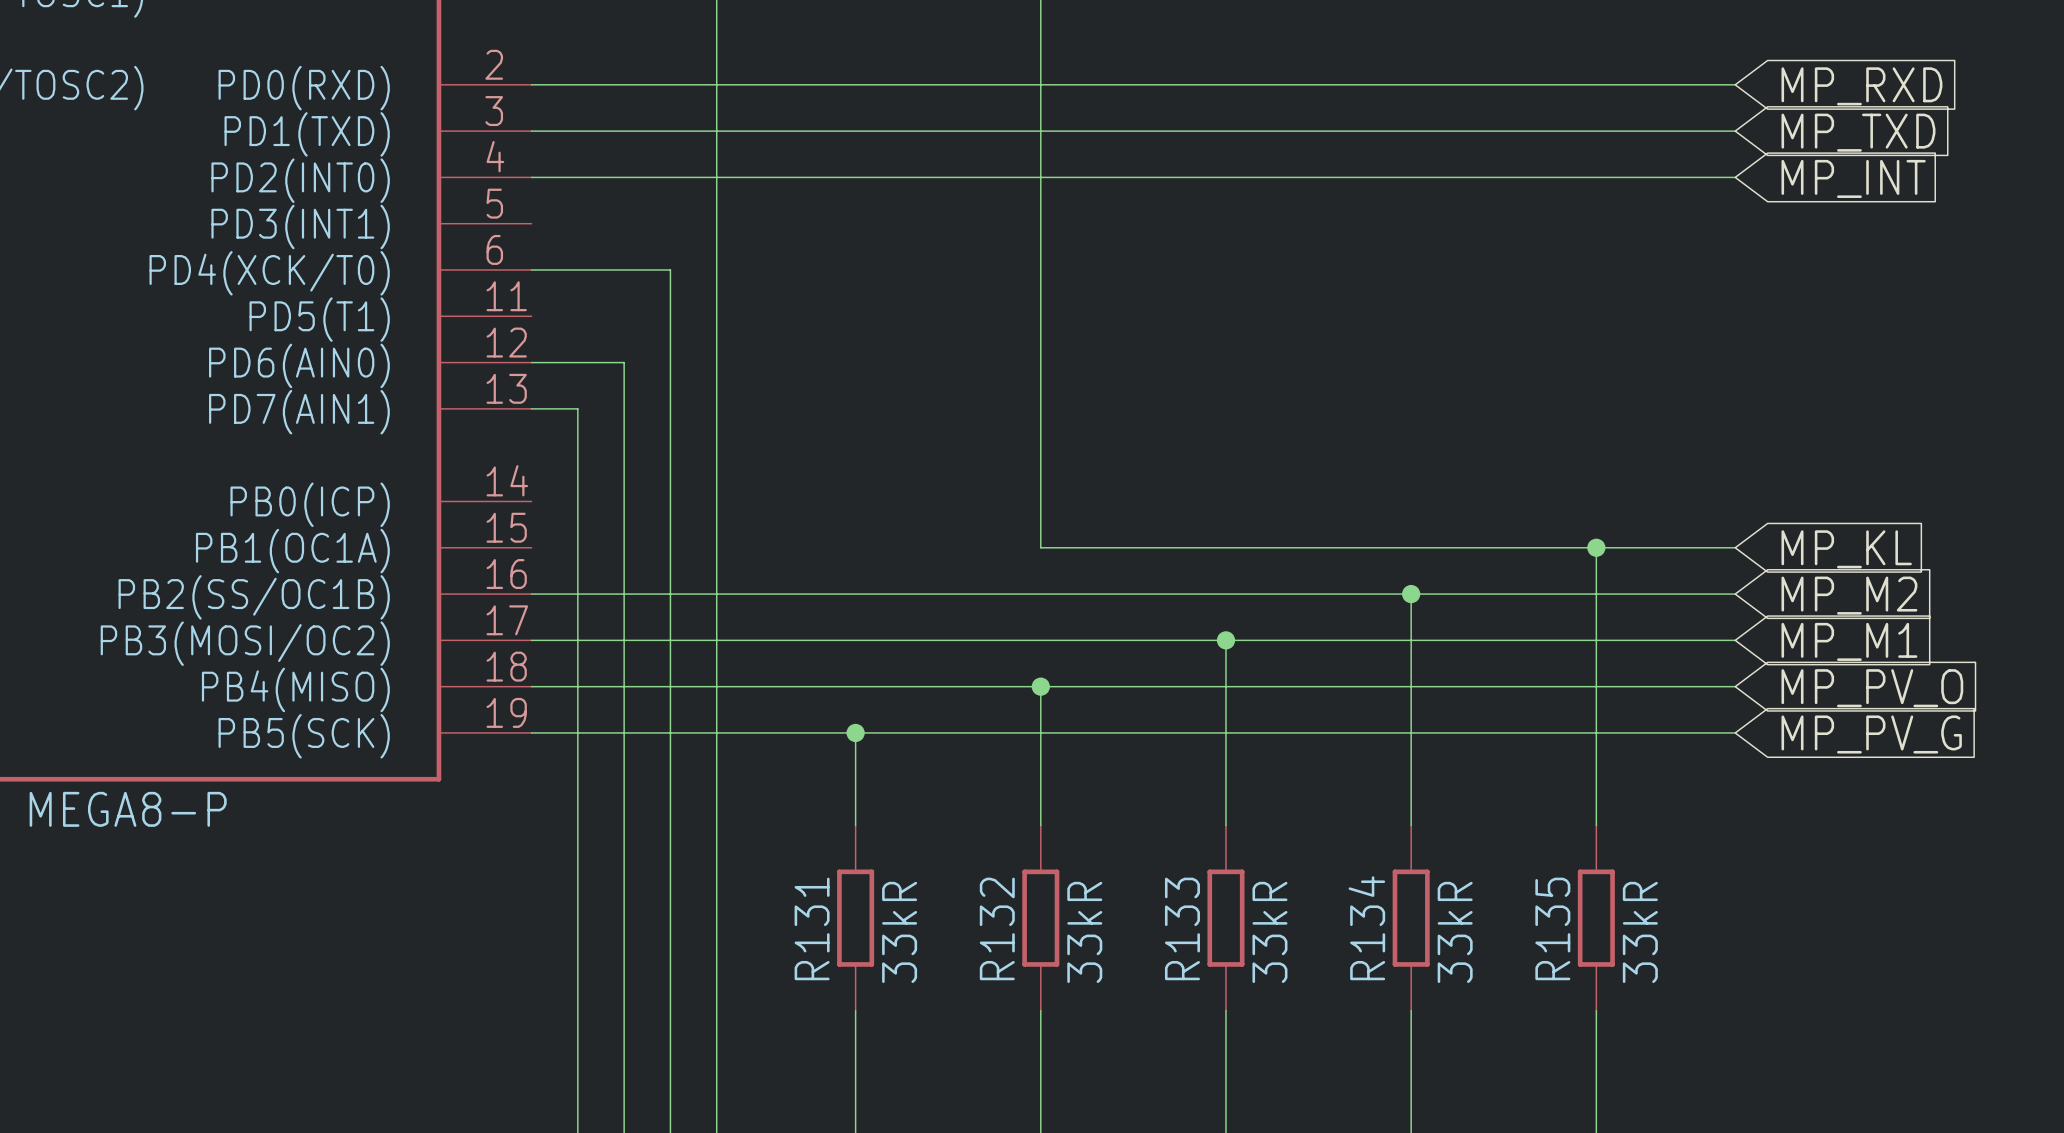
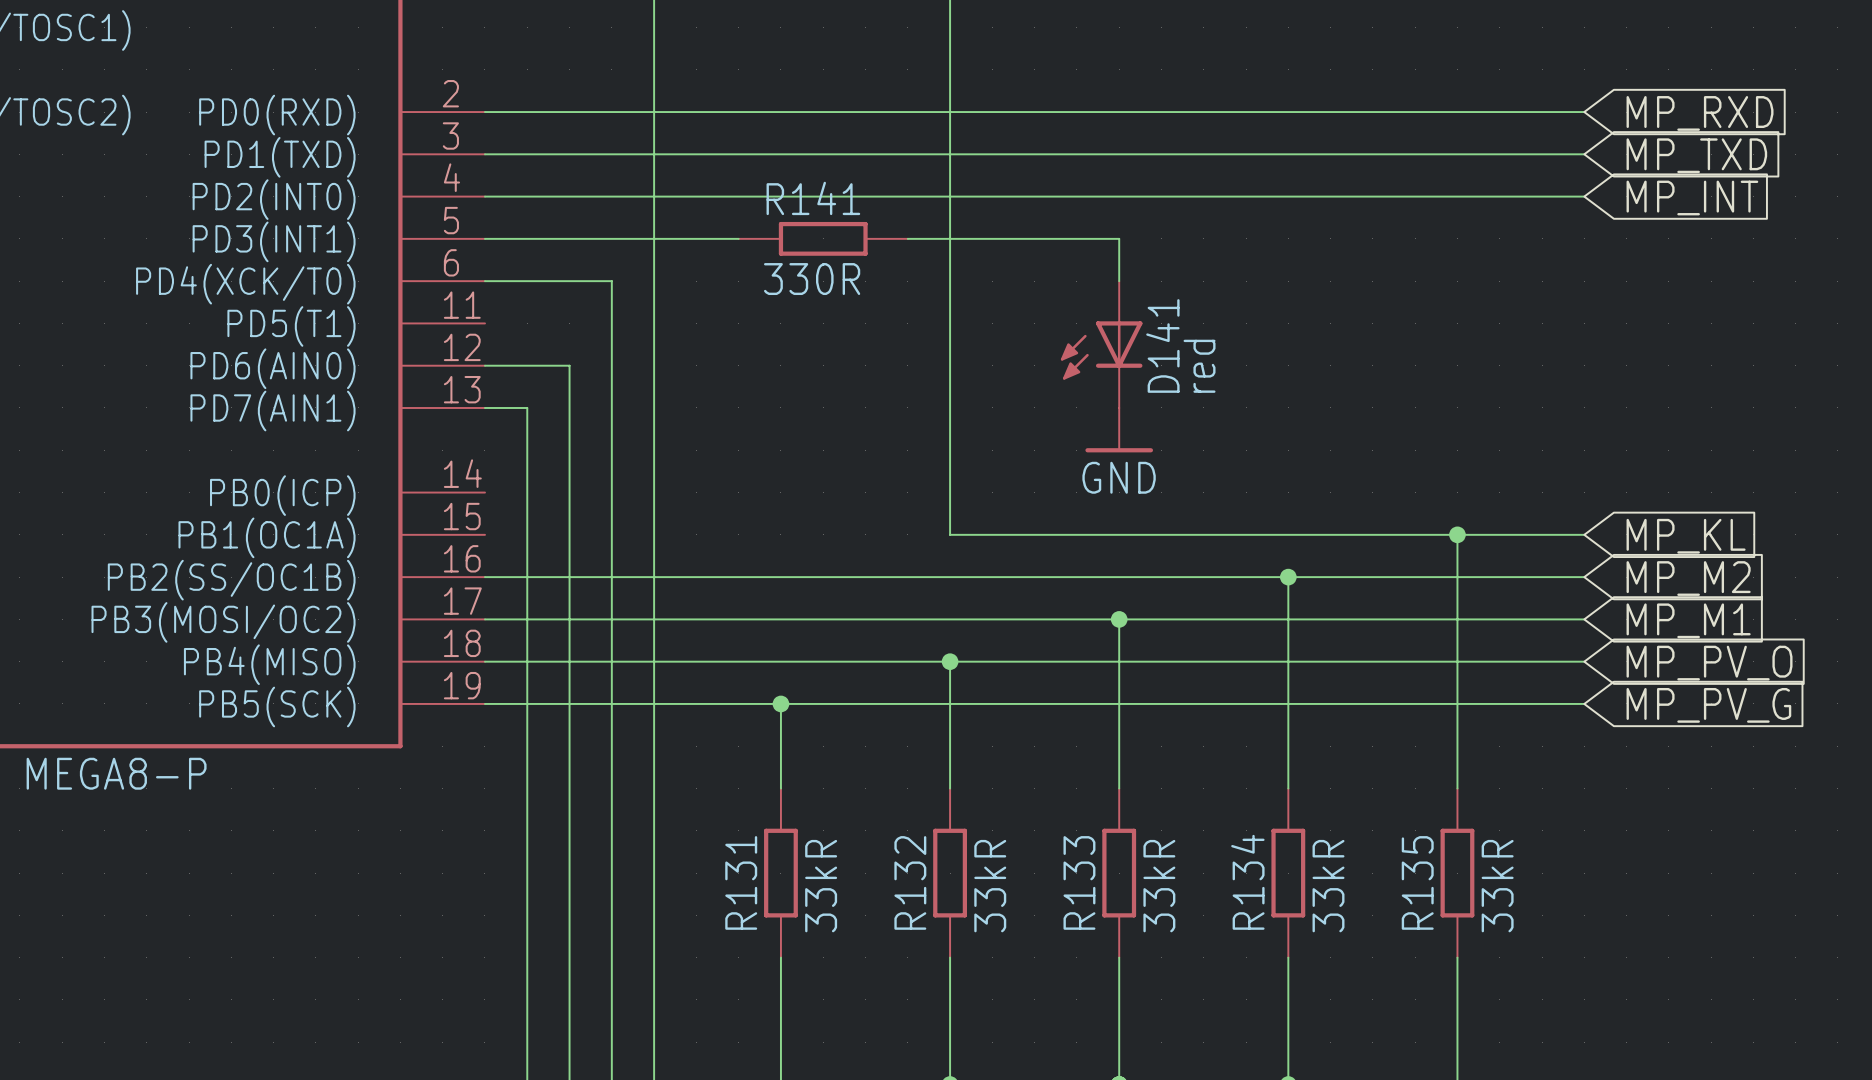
wire: none -> (484, 238) (738, 238)
R141: none -> 330R (823, 238)
wire: none -> (907, 238) (1119, 238) (1119, 281)
D141: none -> red (1101, 344)
power symbol: none -> GND (1119, 430)

